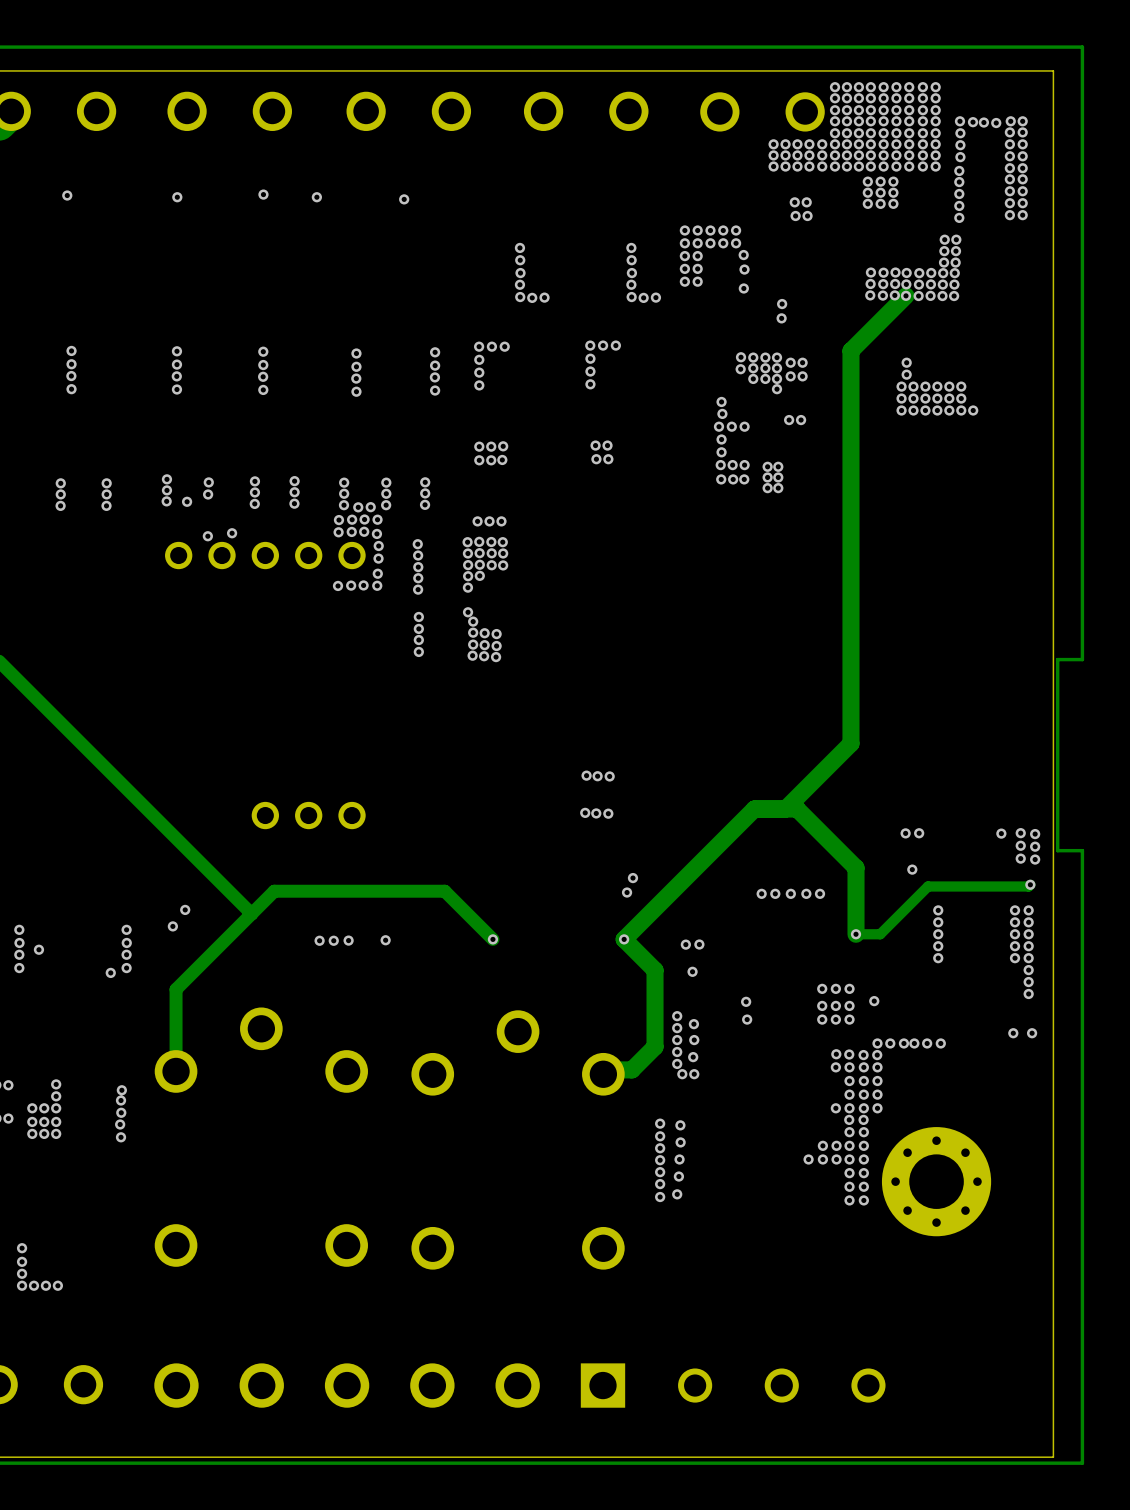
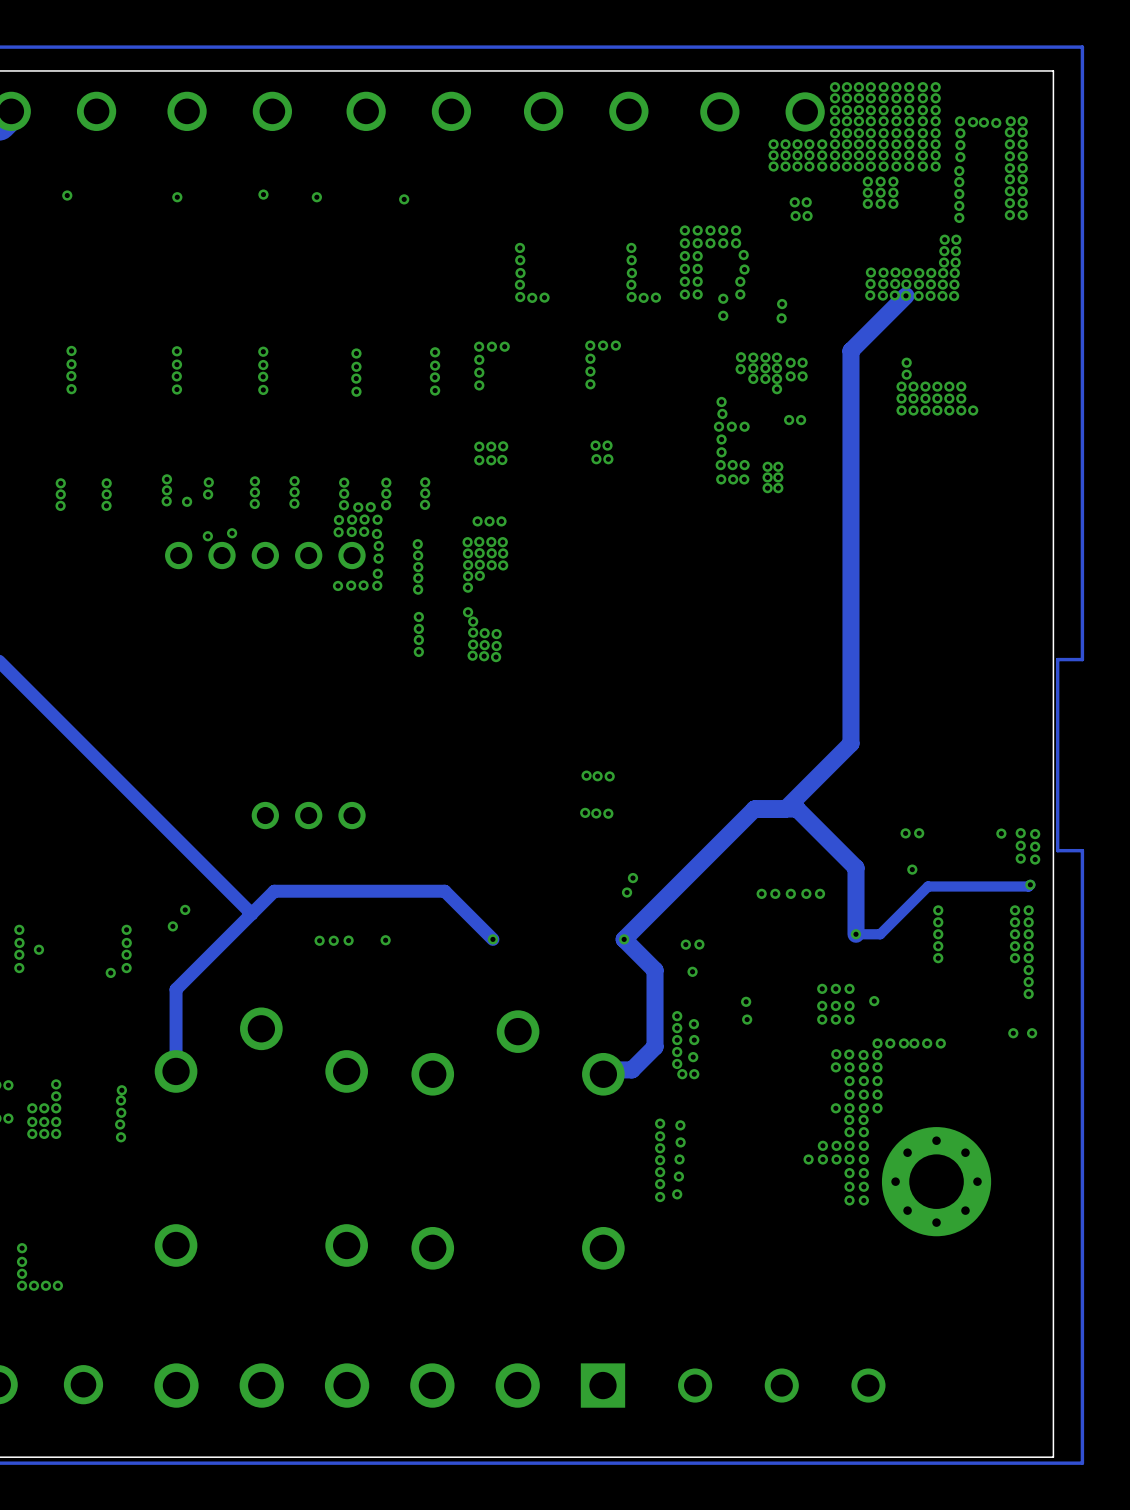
via: none -> (740, 281)
via: (743, 288) -> none
via: none -> (684, 294)
via: none -> (697, 294)
via: none -> (740, 294)
via: none -> (723, 298)
via: none -> (723, 315)

